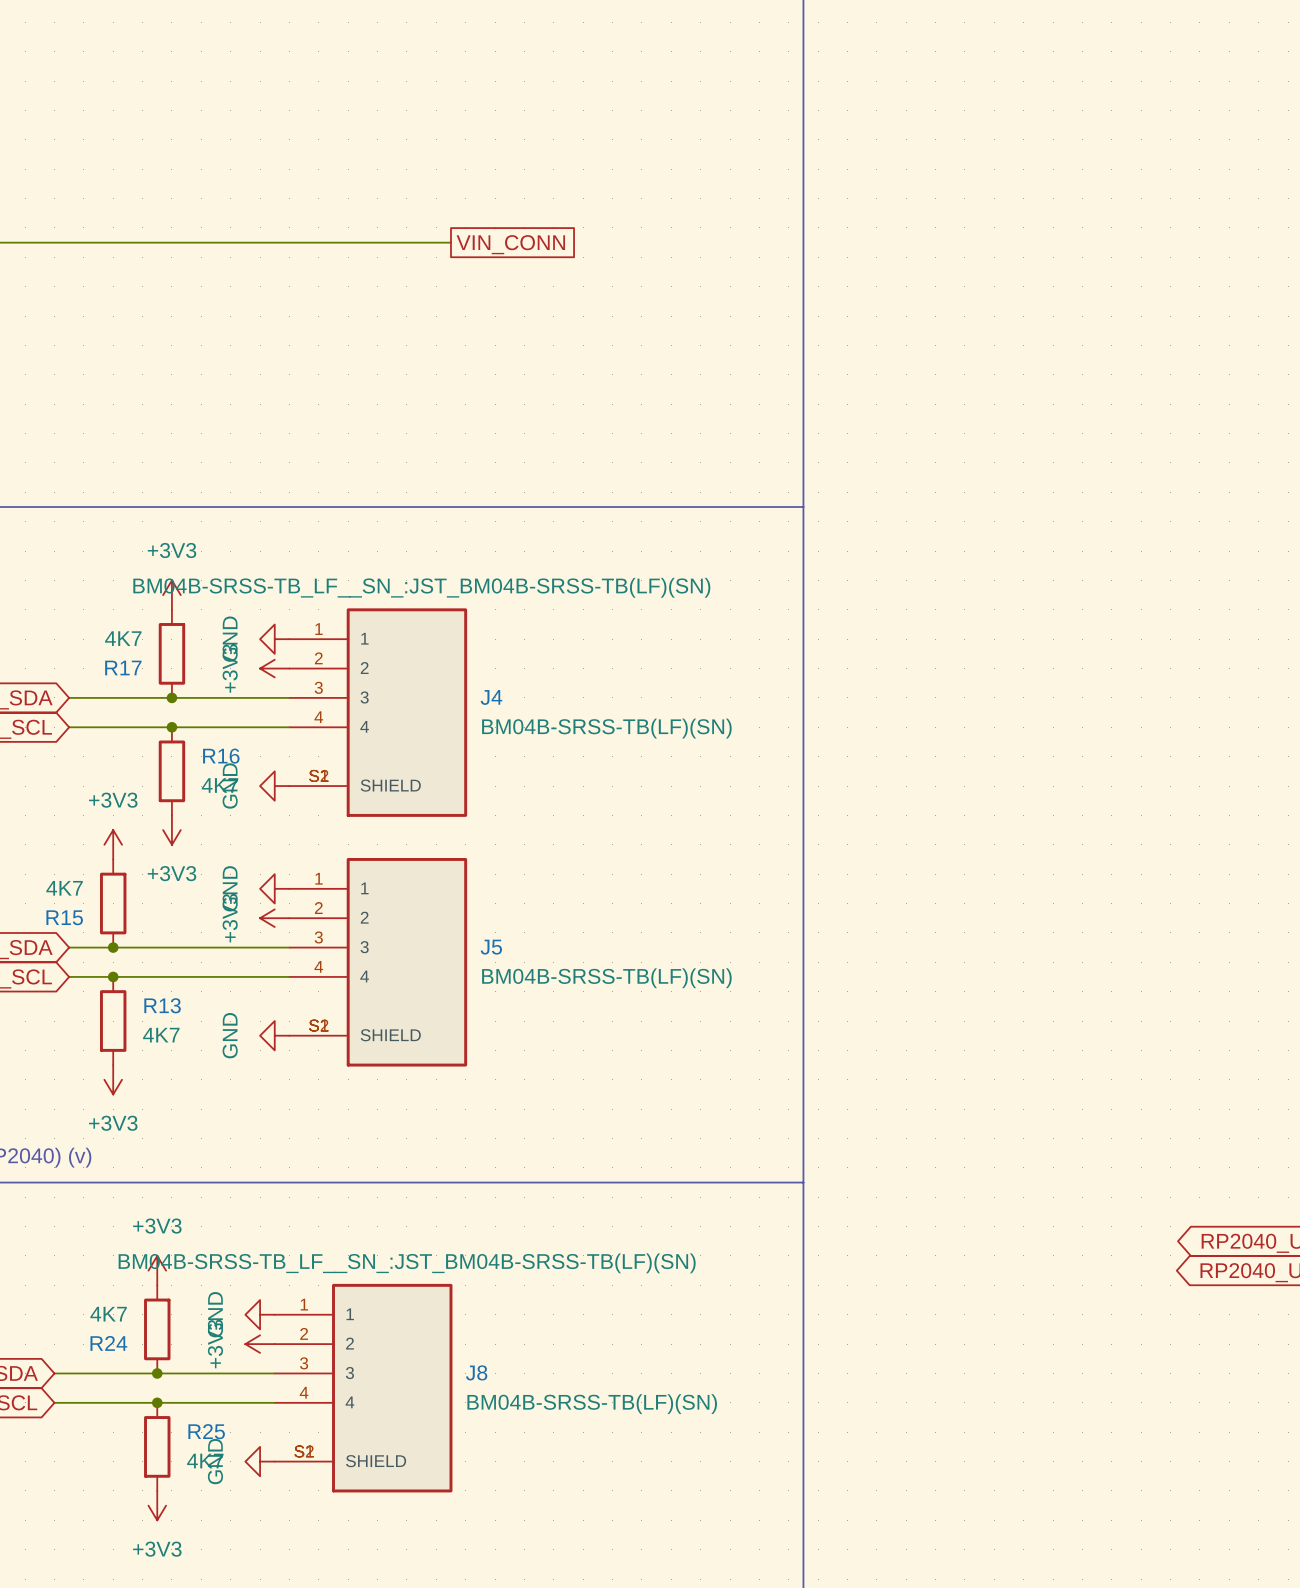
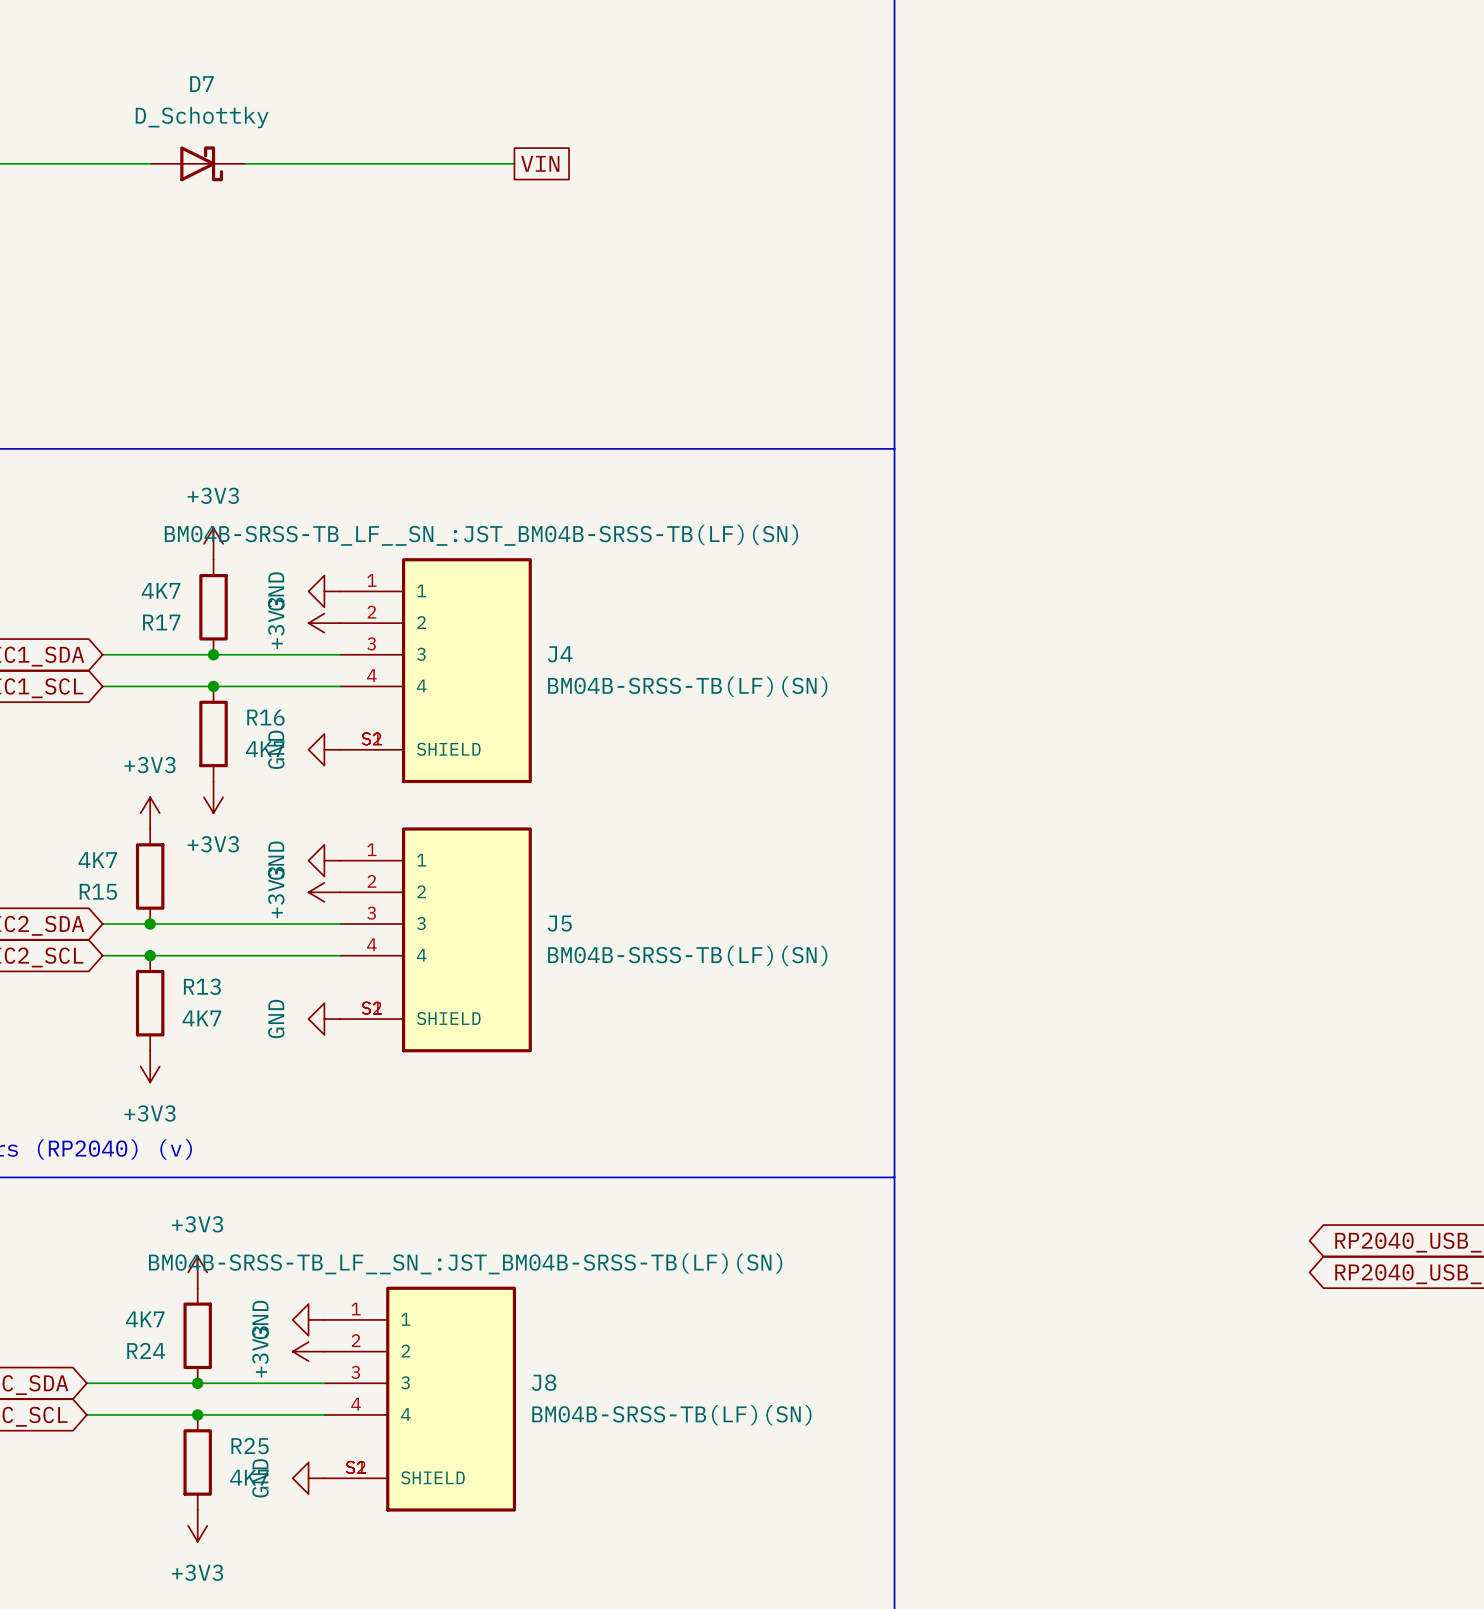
D7: none -> D_Schottky (197, 163)
global label: VIN_CONN (510, 244) -> VIN (540, 163)

